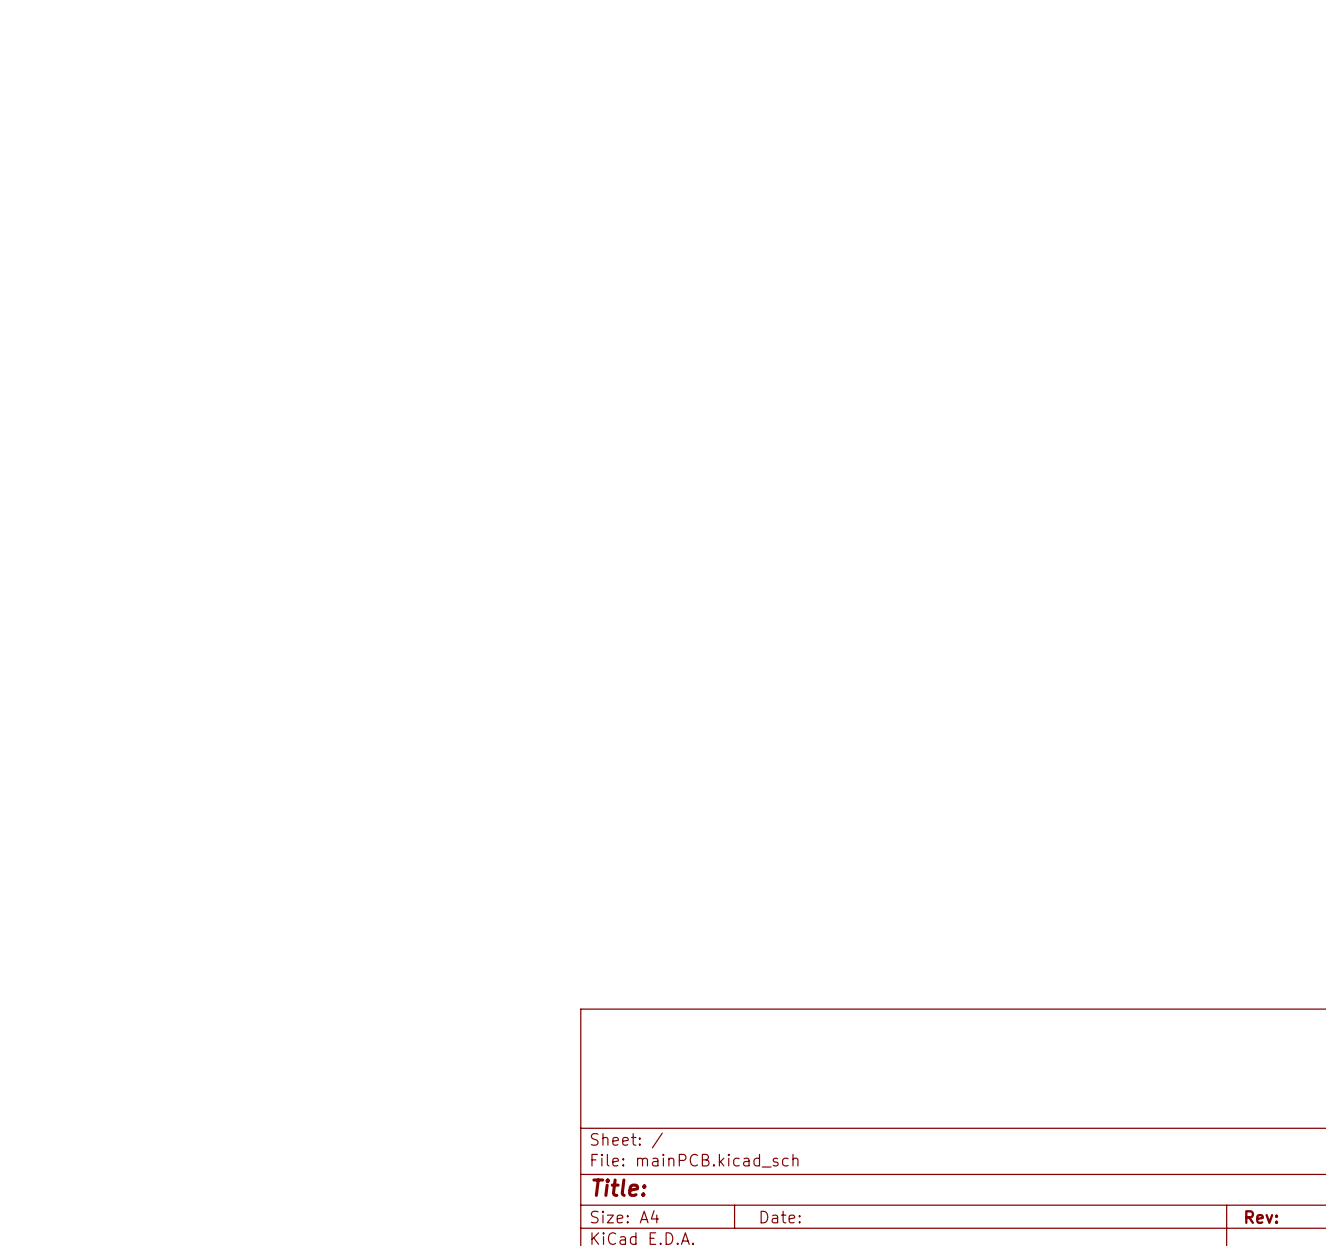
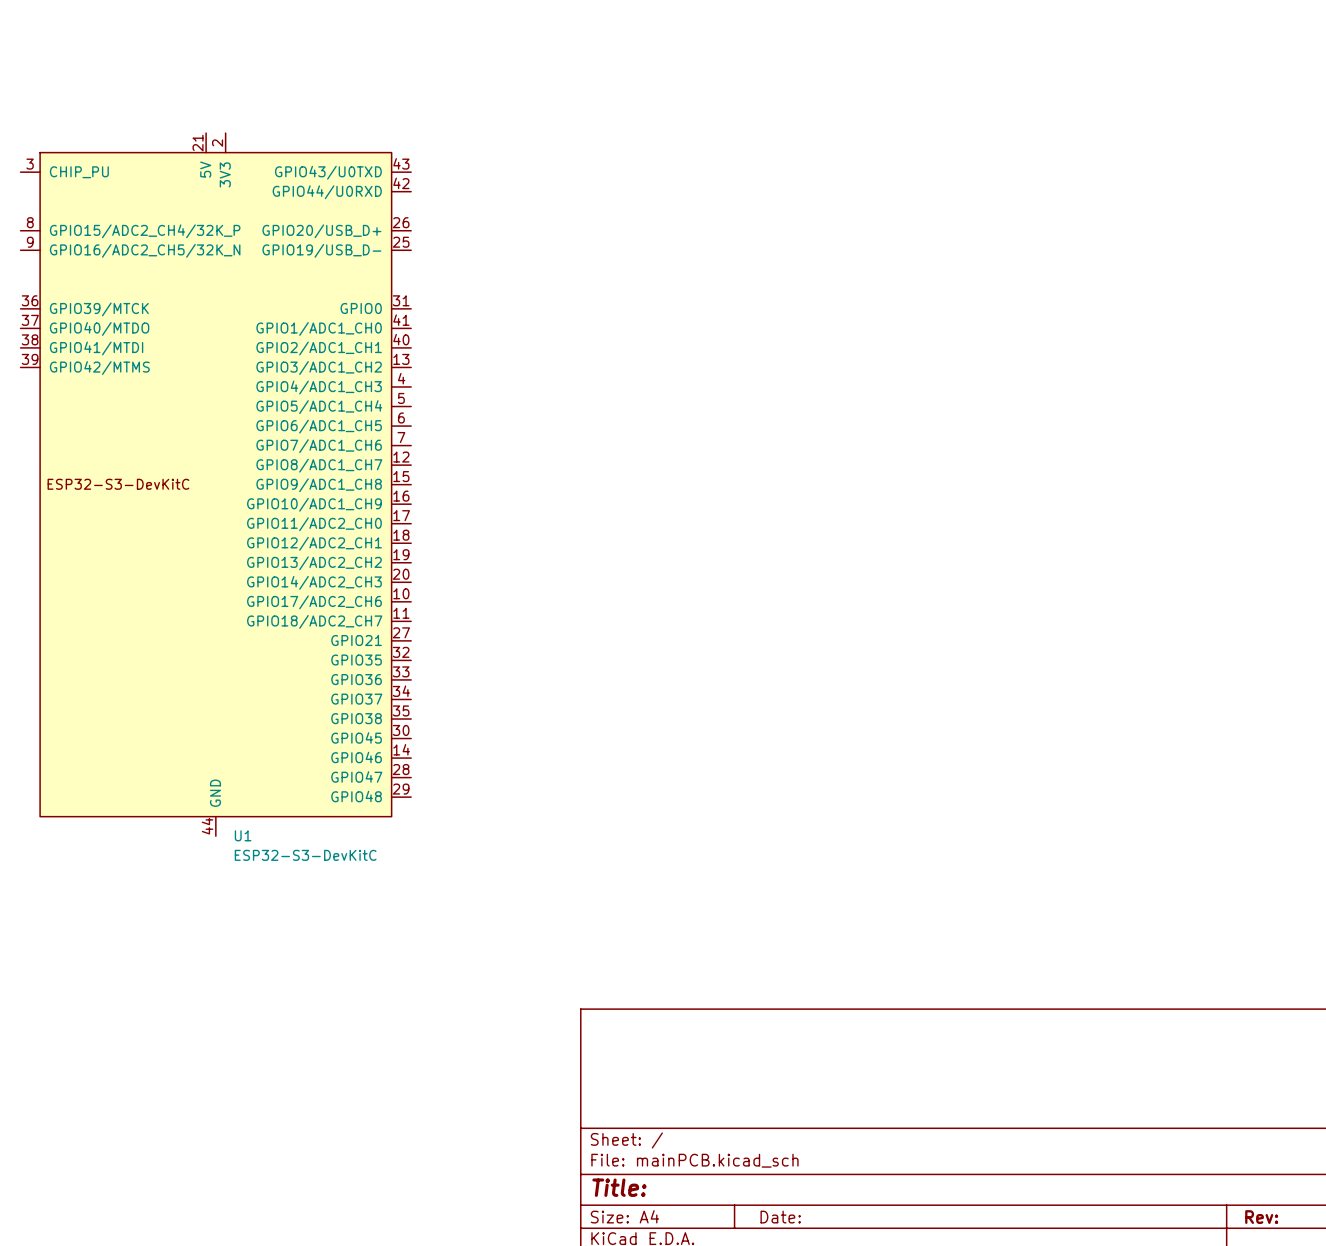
U1: none -> ESP32-S3-DevKitC (215, 484)

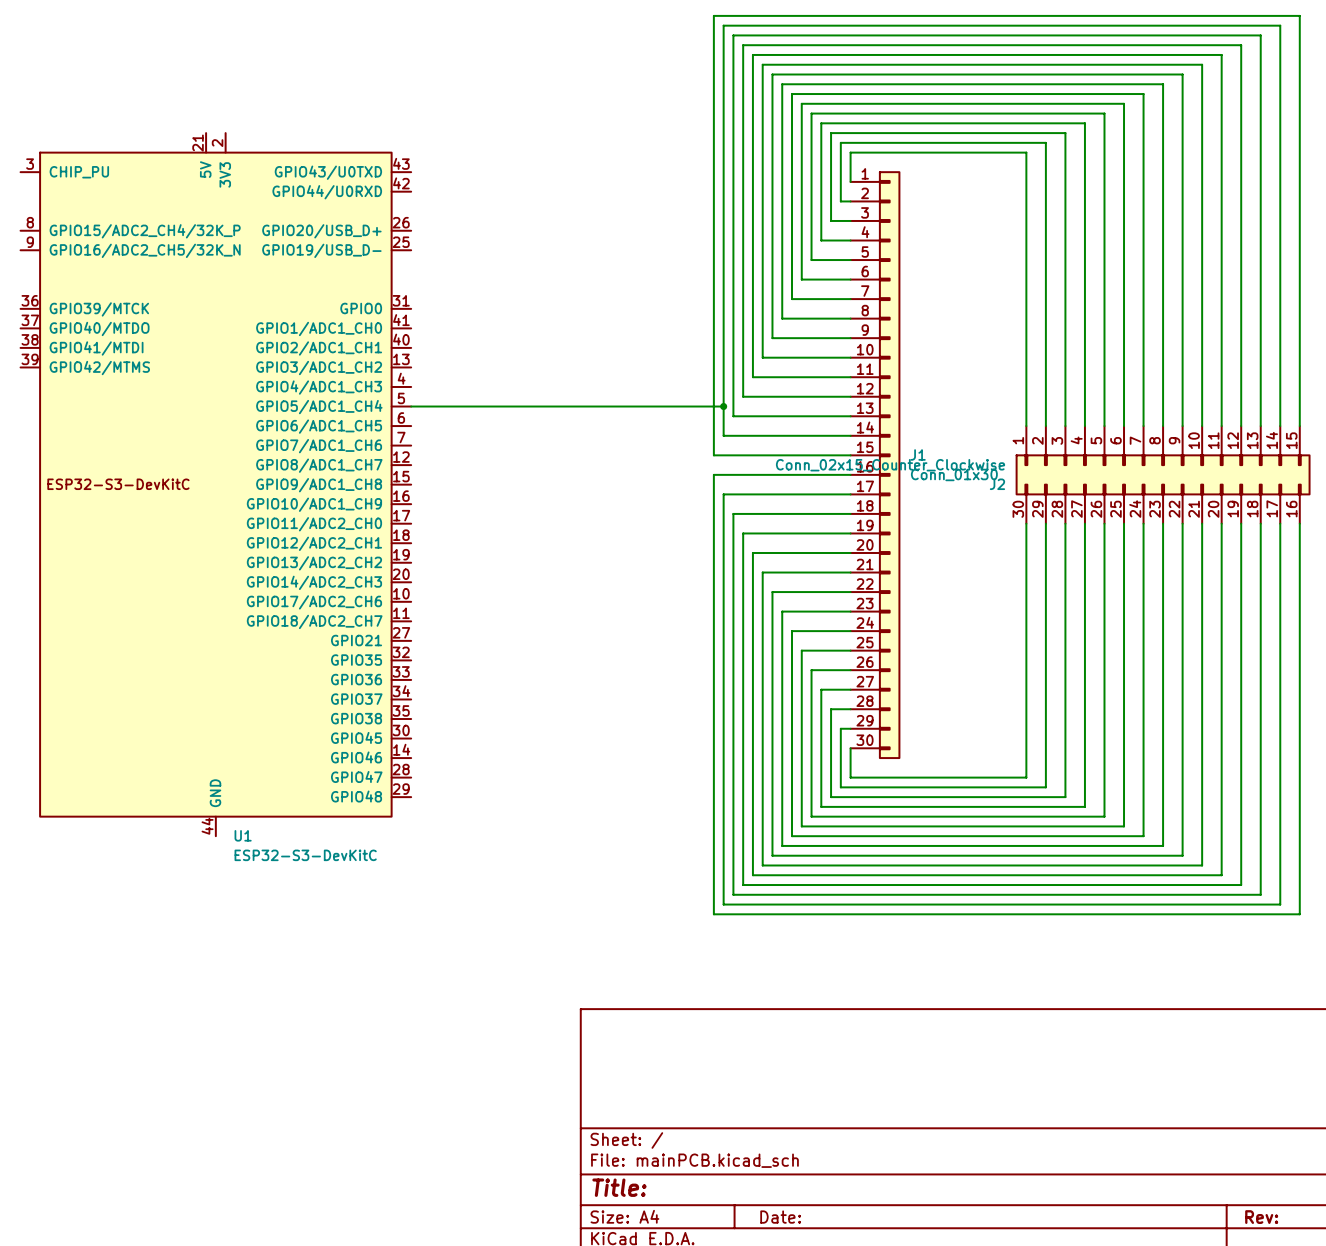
wire: none -> (850, 181) (850, 152) (1026, 152) (1026, 426)
wire: none -> (850, 201) (840, 201) (840, 142) (1045, 142) (1045, 426)
wire: none -> (850, 220) (831, 220) (831, 133) (1065, 133) (1065, 426)
wire: none -> (850, 240) (821, 240) (821, 123) (1084, 123) (1084, 426)
wire: none -> (850, 260) (811, 260) (811, 113) (1104, 113) (1104, 426)
wire: none -> (850, 279) (801, 279) (801, 103) (1124, 103) (1124, 426)
wire: none -> (850, 299) (792, 299) (792, 94) (1143, 94) (1143, 426)
wire: none -> (850, 318) (782, 318) (782, 84) (1163, 84) (1163, 426)
wire: none -> (850, 338) (772, 338) (772, 74) (1182, 74) (1182, 426)
wire: none -> (850, 357) (762, 357) (762, 64) (1202, 64) (1202, 426)
wire: none -> (850, 377) (752, 377) (752, 54) (1221, 54) (1221, 426)
wire: none -> (850, 396) (743, 396) (743, 45) (1241, 45) (1241, 426)
wire: none -> (411, 406) (723, 406)
junction: none -> (723, 406)
wire: none -> (850, 416) (733, 416) (733, 35) (1260, 35) (1260, 426)
wire: none -> (1280, 426) (1280, 25) (723, 25) (723, 435) (850, 435)
wire: none -> (1299, 426) (1299, 15) (713, 15) (713, 455) (850, 455)
J1: none -> Conn_01x30 (875, 465)
wire: none -> (850, 474) (713, 474) (713, 914) (1299, 914) (1299, 523)
J2: none -> Conn_02x15_Counter_Clockwise (1163, 474)
wire: none -> (850, 494) (723, 494) (723, 904) (1280, 904) (1280, 523)
wire: none -> (850, 513) (733, 513) (733, 894) (1260, 894) (1260, 523)
wire: none -> (1026, 523) (1026, 777) (850, 777) (850, 748)
wire: none -> (1045, 523) (1045, 787) (840, 787) (840, 728) (850, 728)
wire: none -> (1065, 523) (1065, 797) (831, 797) (831, 709) (850, 709)
wire: none -> (1084, 523) (1084, 806) (821, 806) (821, 689) (850, 689)
wire: none -> (1104, 523) (1104, 816) (811, 816) (811, 670) (850, 670)
wire: none -> (1124, 523) (1124, 826) (801, 826) (801, 650) (850, 650)
wire: none -> (1143, 523) (1143, 836) (792, 836) (792, 631) (850, 631)
wire: none -> (1163, 523) (1163, 845) (782, 845) (782, 611) (850, 611)
wire: none -> (1182, 523) (1182, 855) (772, 855) (772, 592) (850, 592)
wire: none -> (1202, 523) (1202, 865) (762, 865) (762, 572) (850, 572)
wire: none -> (1221, 523) (1221, 875) (752, 875) (752, 552) (850, 552)
wire: none -> (1241, 523) (1241, 885) (743, 885) (743, 533) (850, 533)

